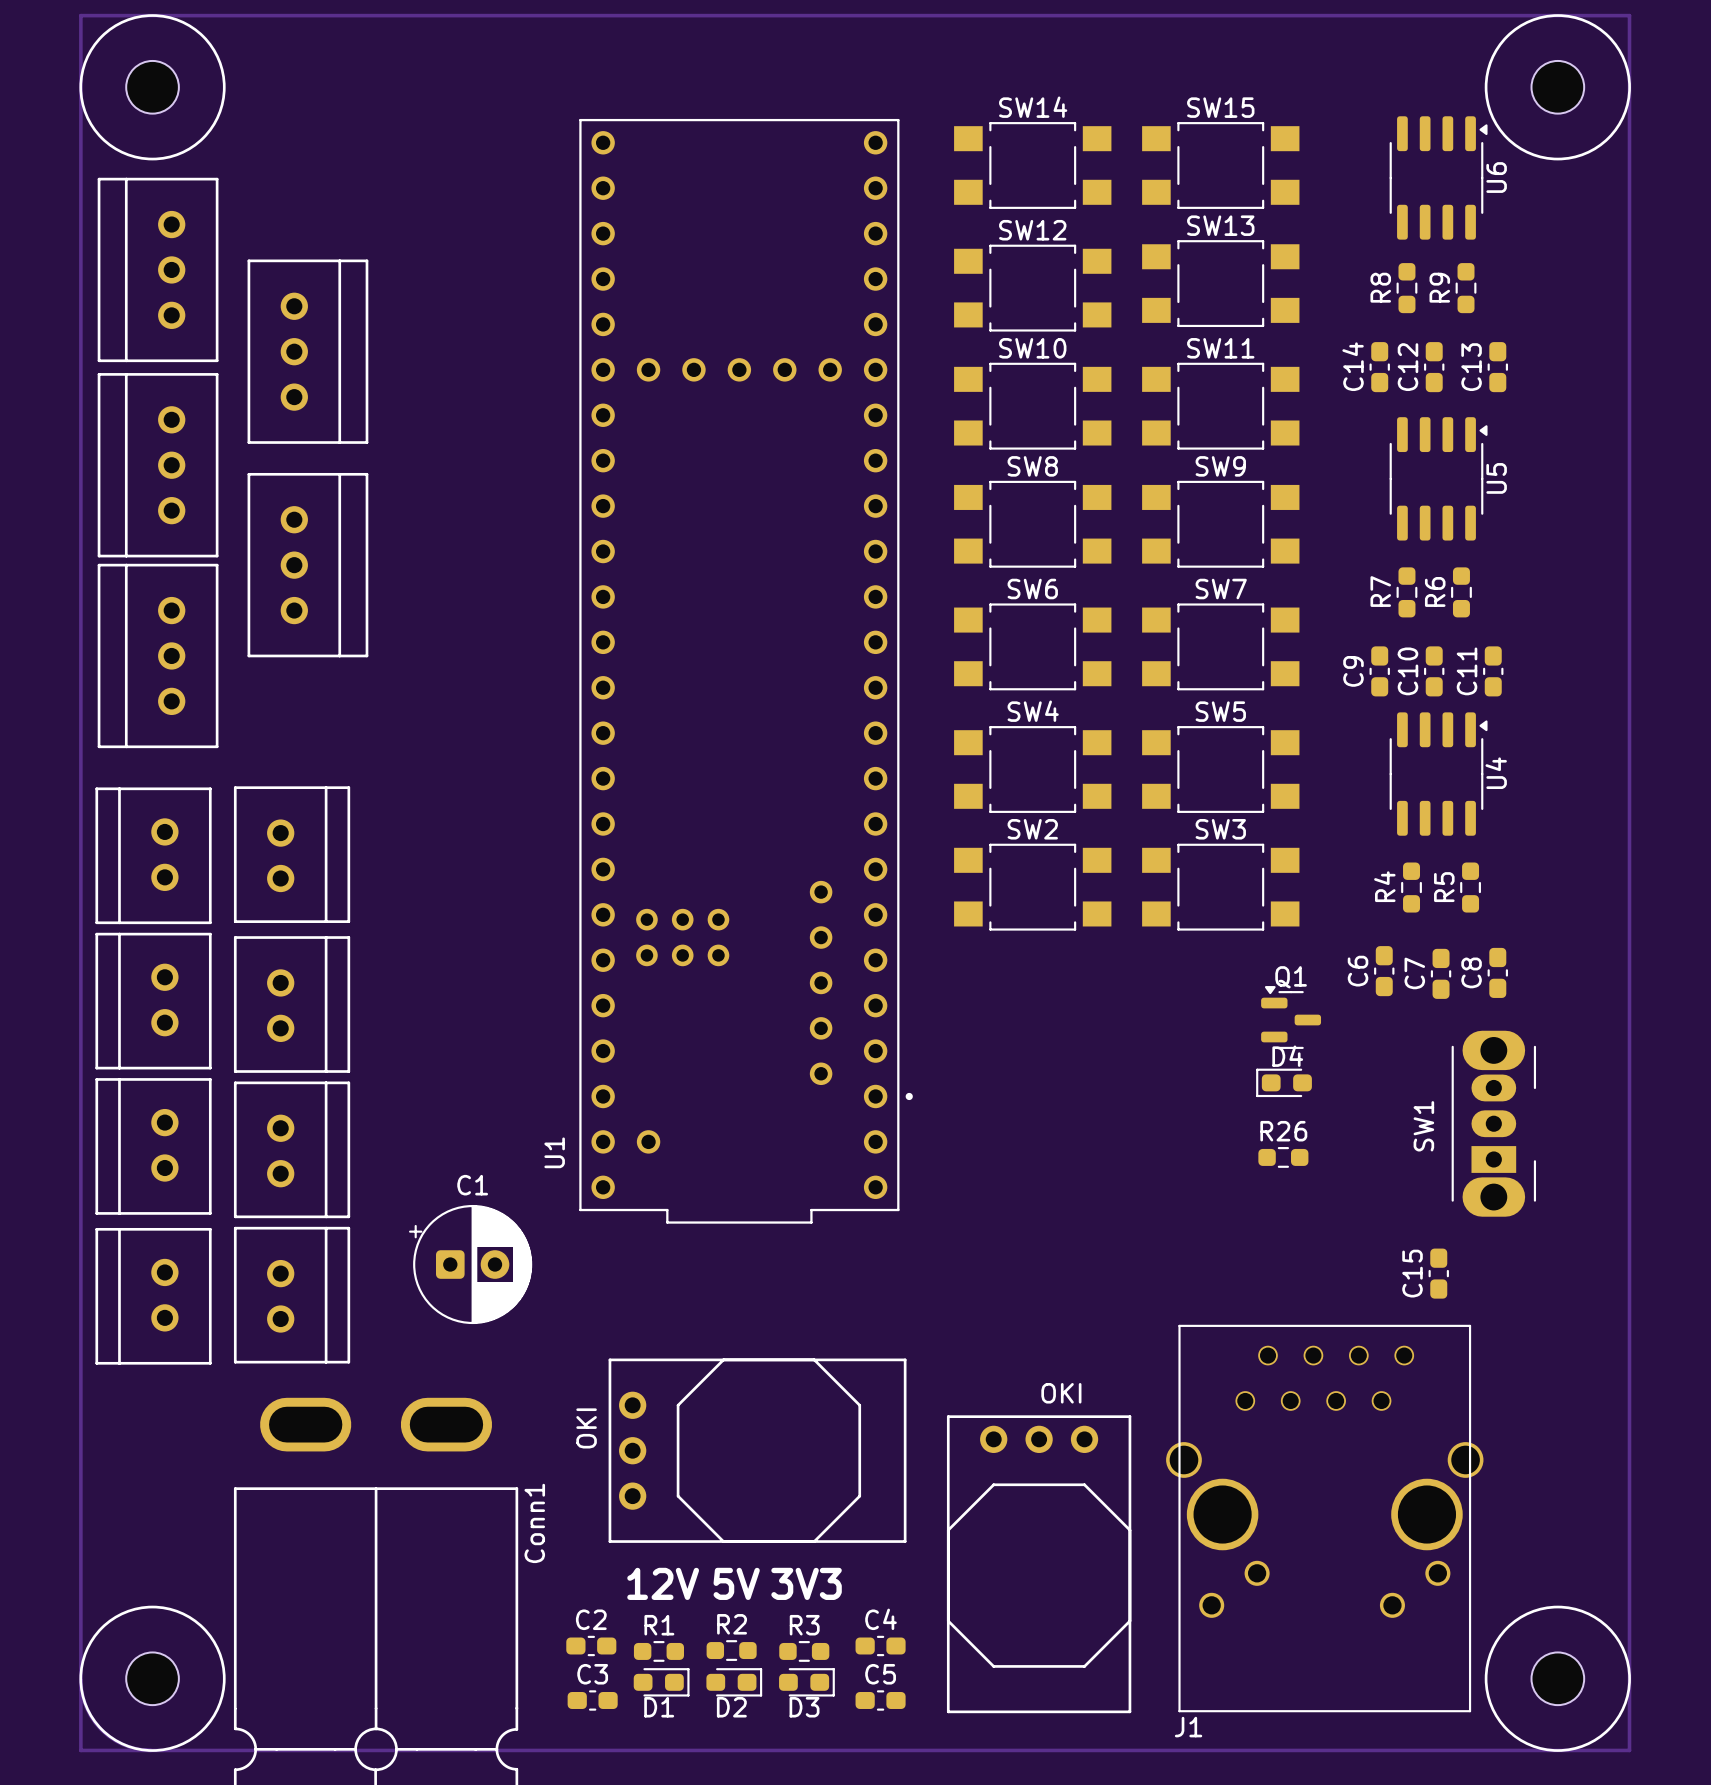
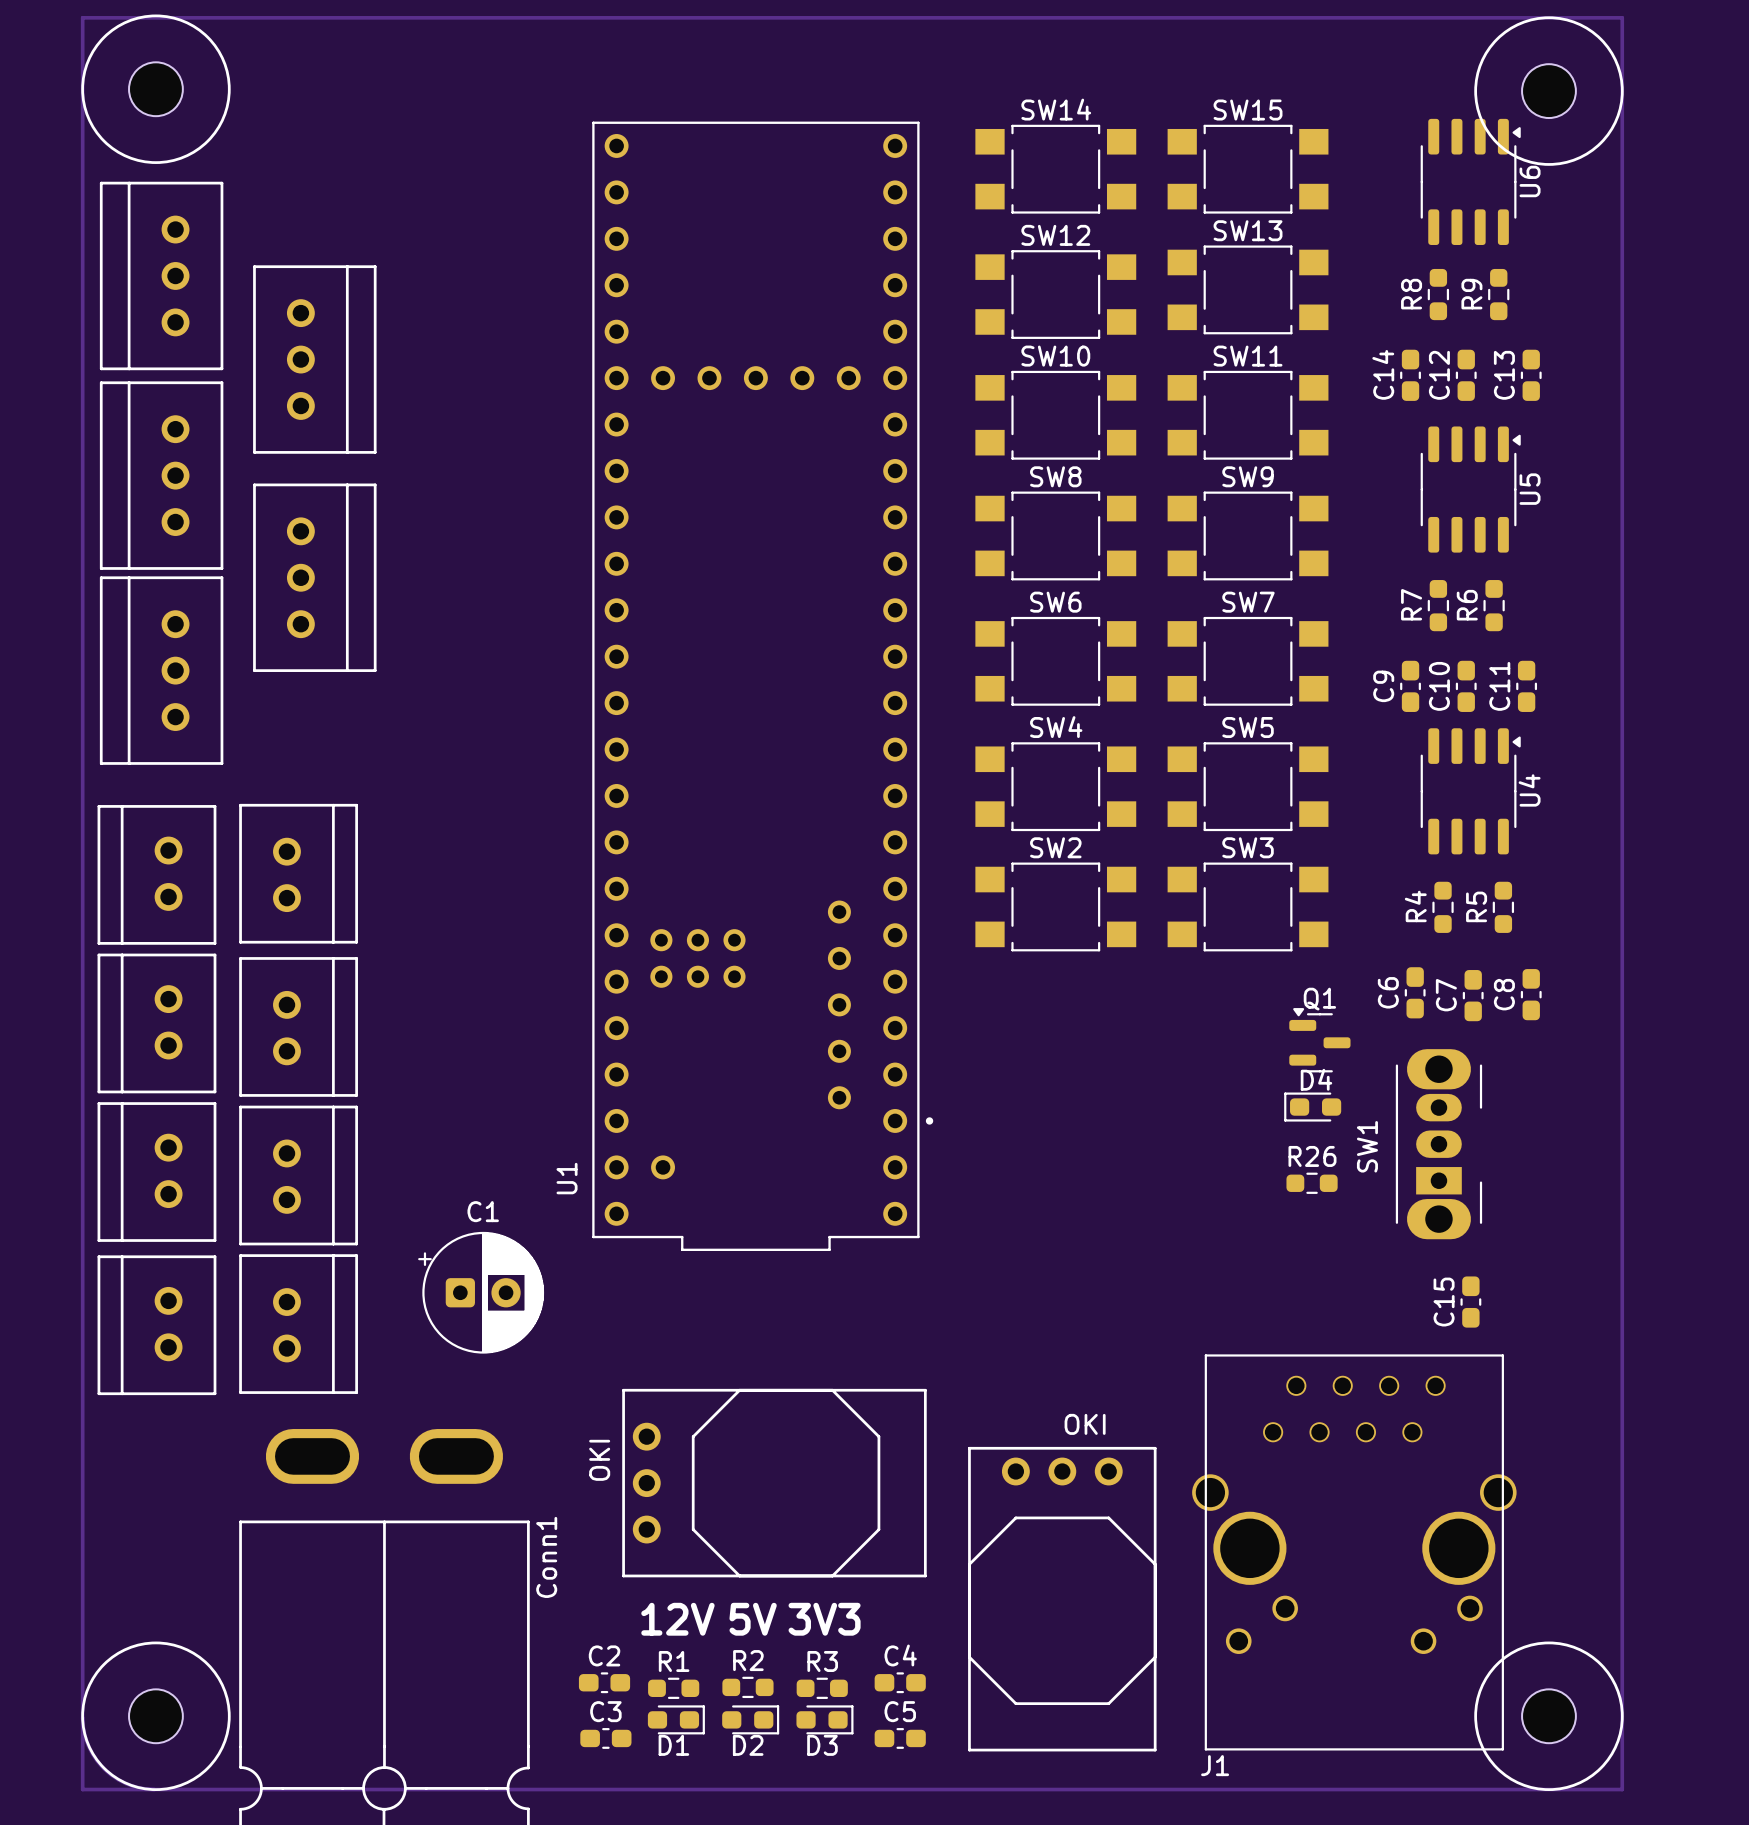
track: (80, 17) (80, 15) (1629, 15) (1629, 1750) (1586, 1750) -> (82, 17) (1622, 17) (1622, 1789)
part position: (1557, 87) -> (1548, 91)
SW1 position: (1493, 1123) -> (1438, 1144)
part position: (1557, 1678) -> (1548, 1716)

